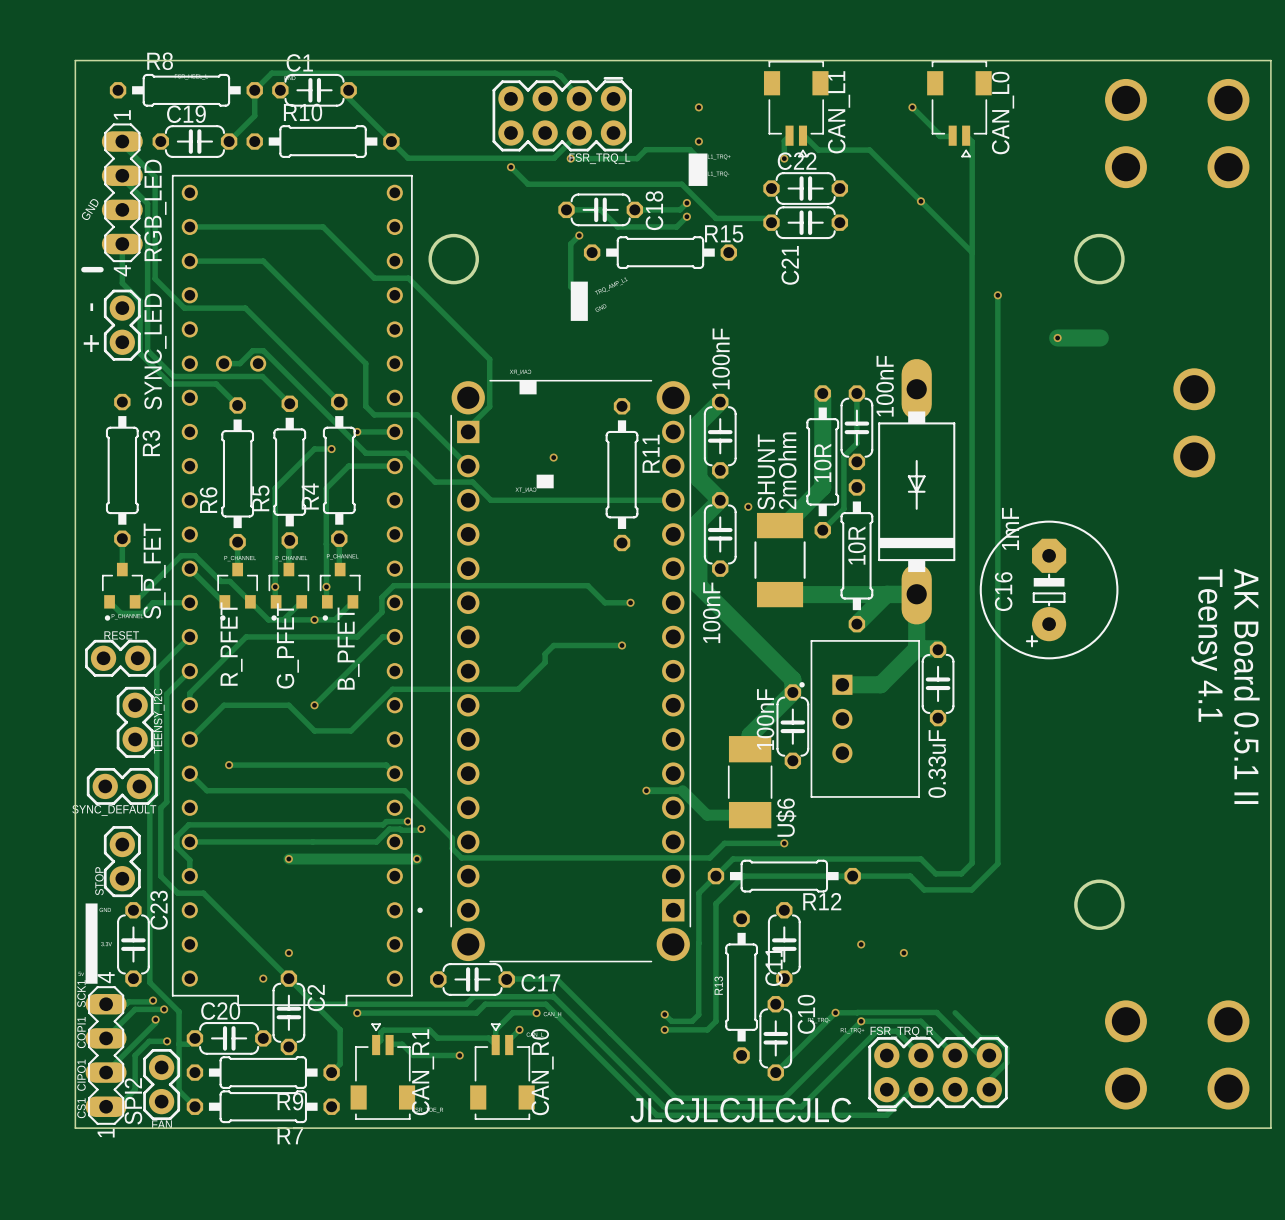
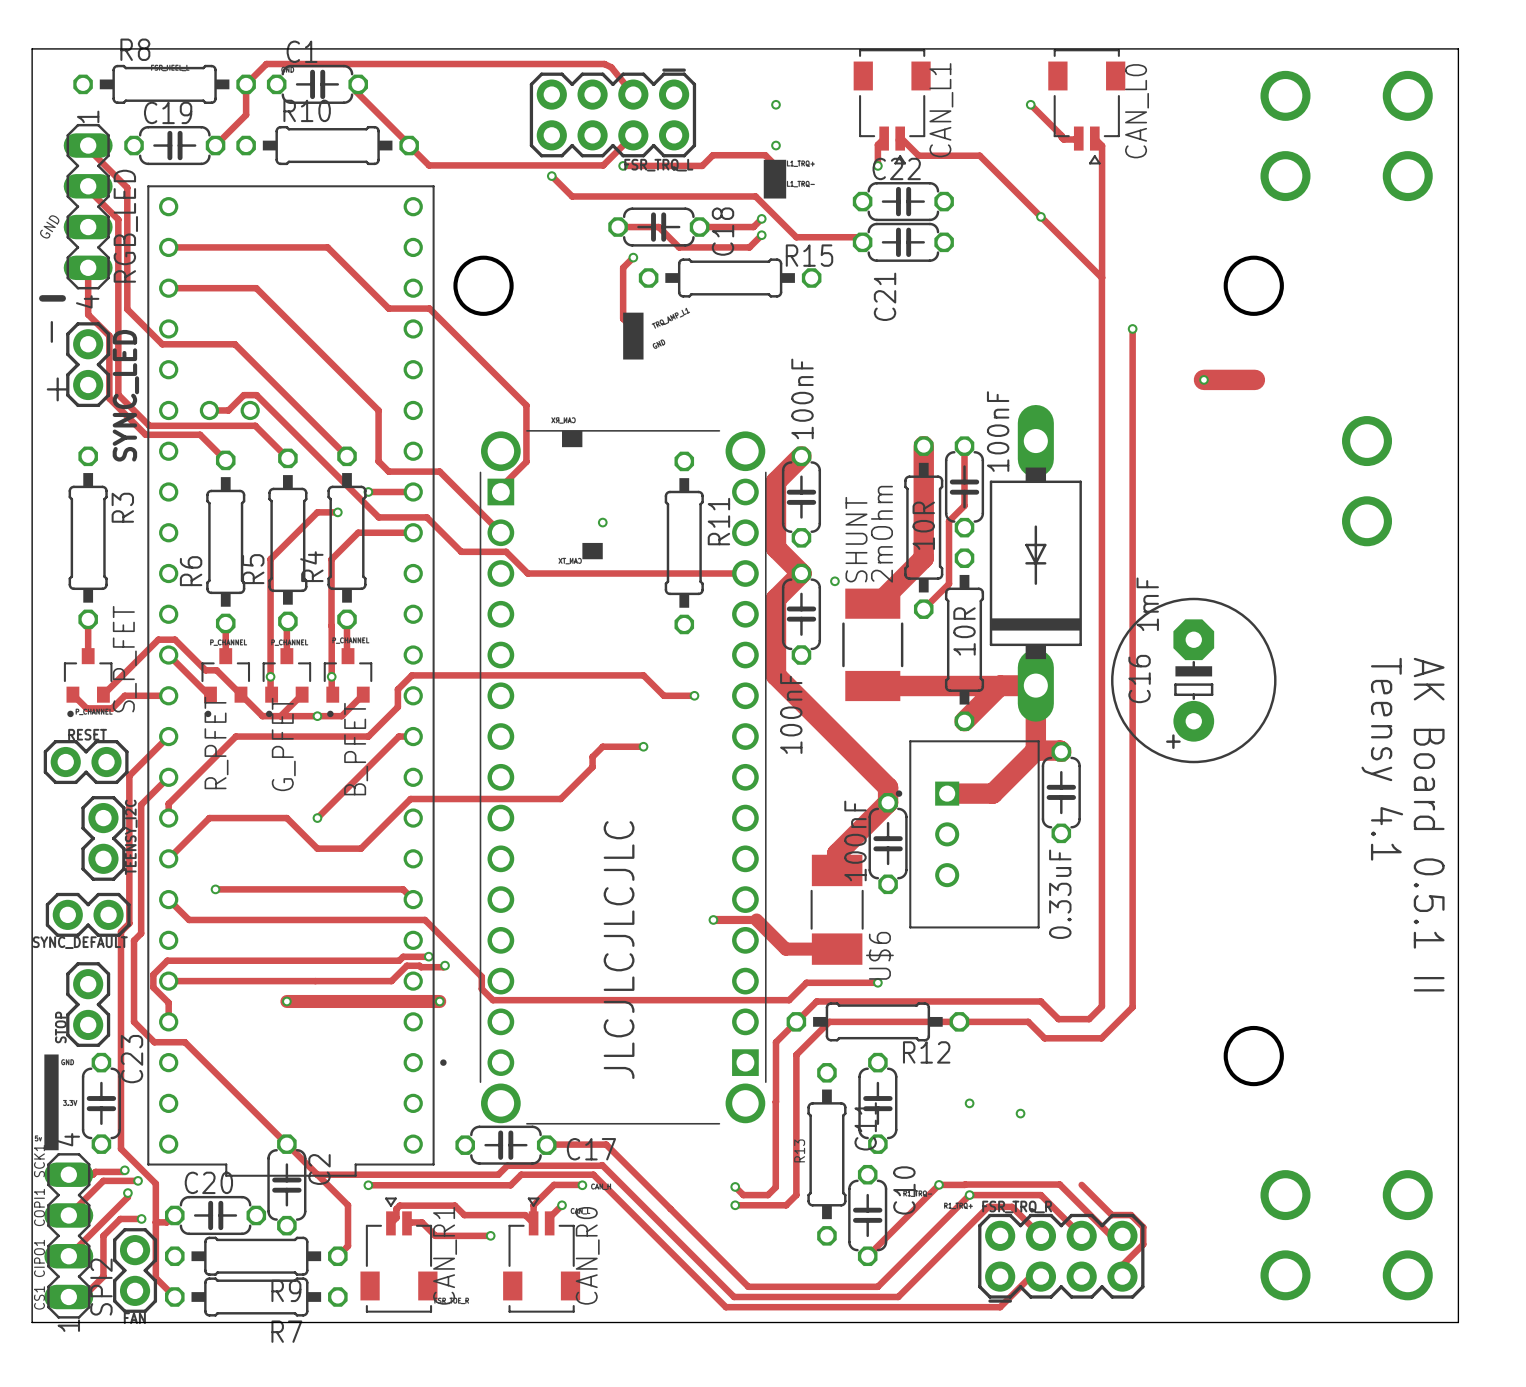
track: (587, 645) (622, 645) -> none
via position: (622, 645) -> (643, 746)
via: (288, 952) -> none
via: (263, 978) -> none
text rotation: 0° (741, 1110) -> 90° counterclockwise (619, 950)
text position: JLCJLCJLCJLC (741, 1110) -> JLCJLCJLCJLC (619, 950)

